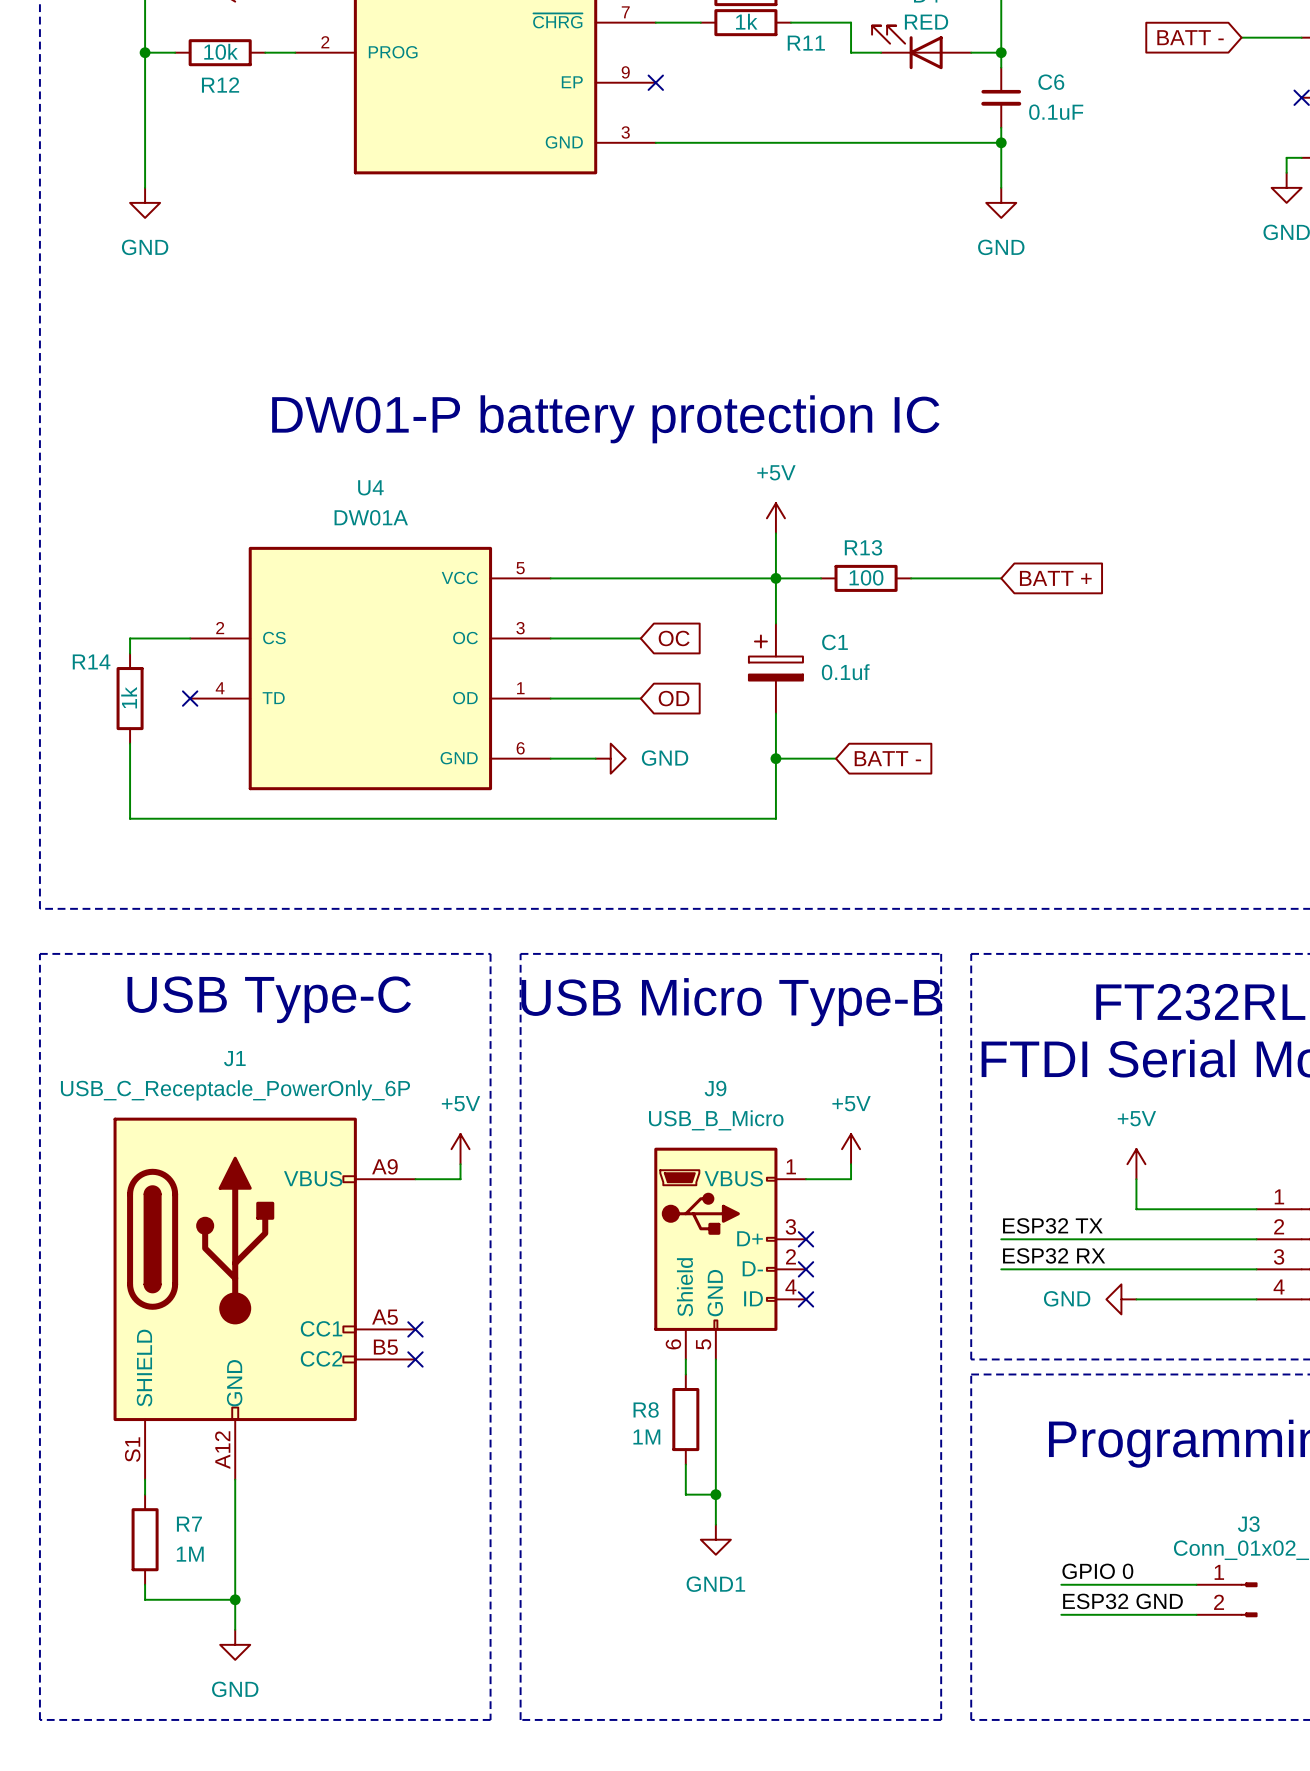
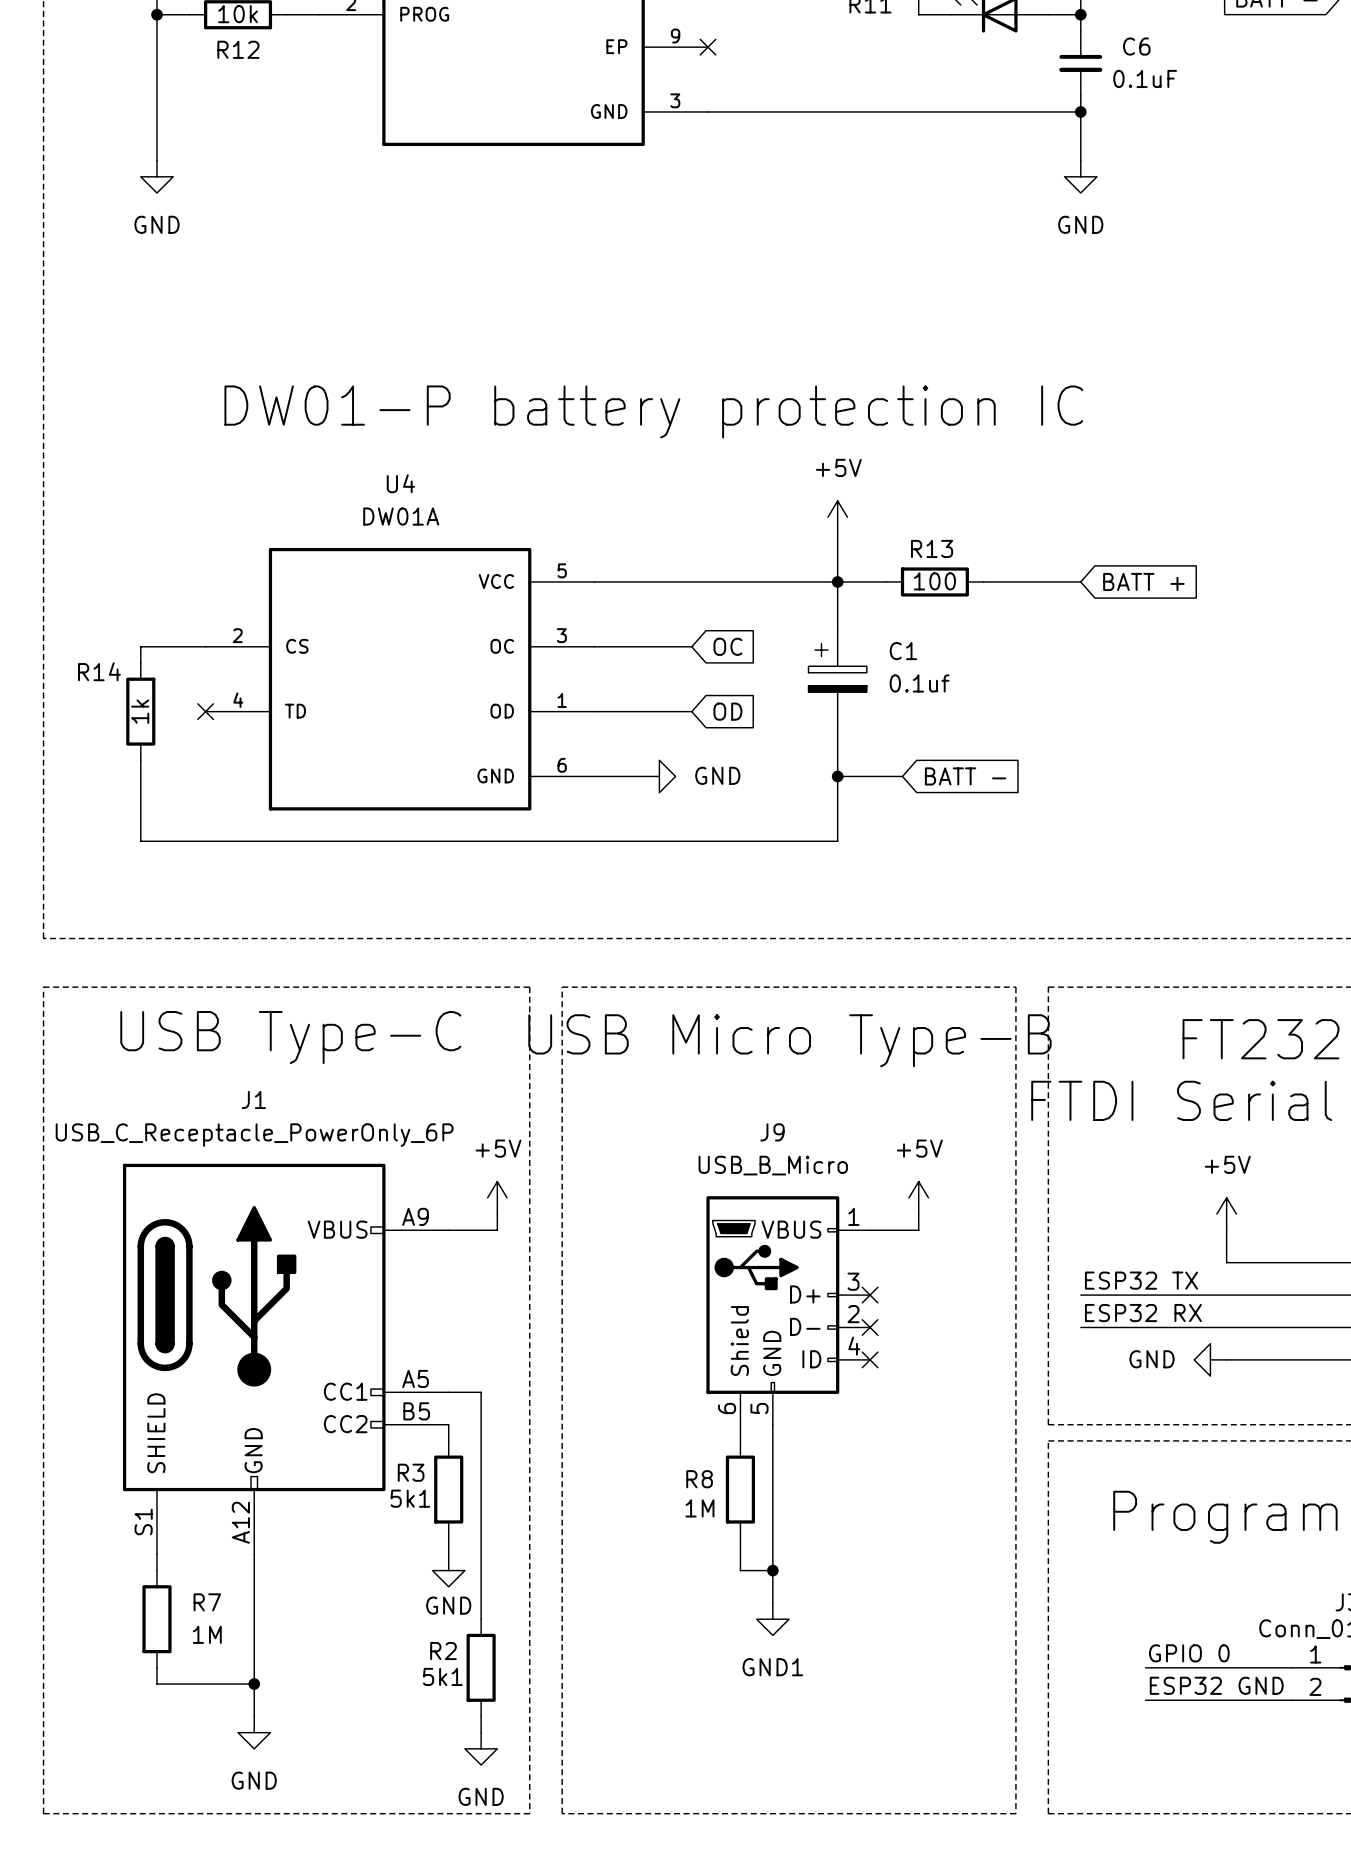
wire: none -> (448, 1392) (481, 1392) (481, 1619)
no-connect mark: (415, 1329) -> none
wire: none -> (448, 1424) (448, 1440)
no-connect mark: (415, 1359) -> none
R3: none -> 5k1 (448, 1489)
wire: none -> (448, 1538) (448, 1554)
power symbol: none -> GND (448, 1570)
R2: none -> 5k1 (481, 1667)
wire: none -> (481, 1716) (481, 1732)
power symbol: none -> GND (481, 1748)

